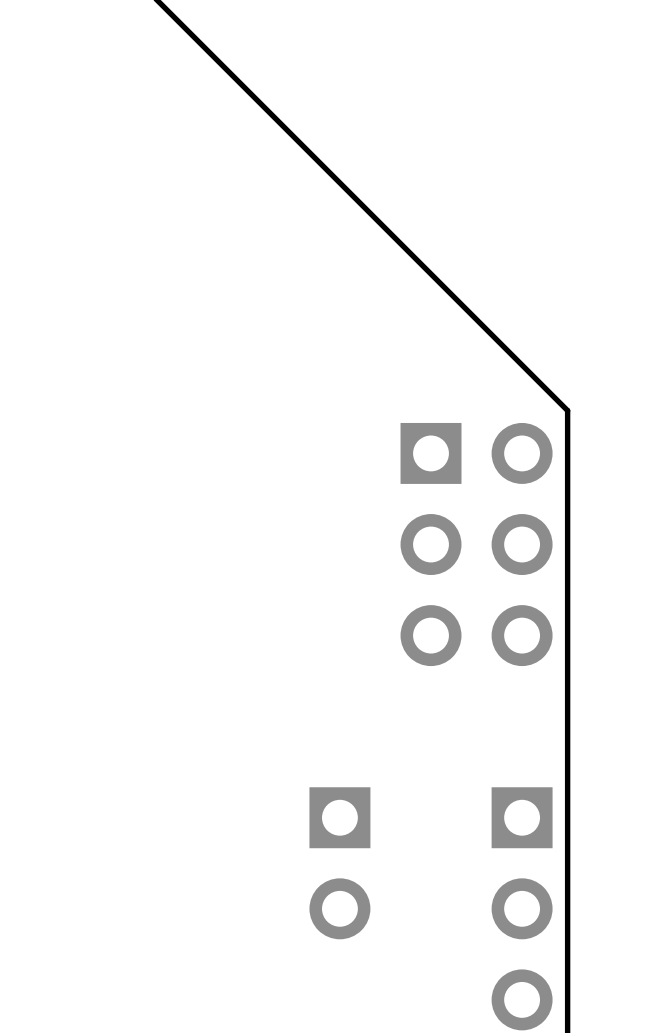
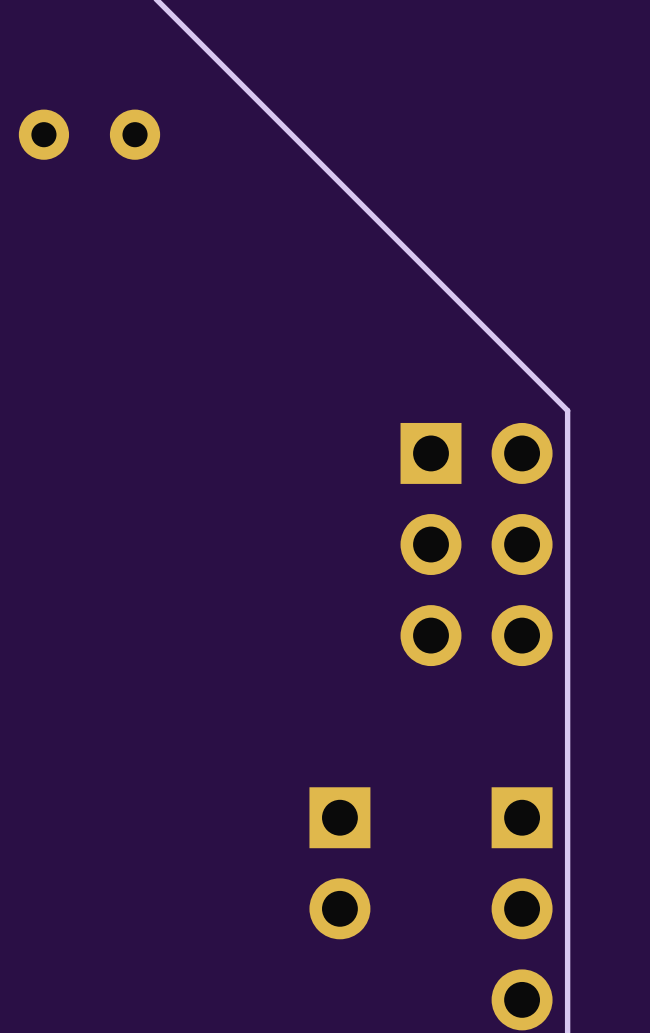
part: none -> (89, 134)

